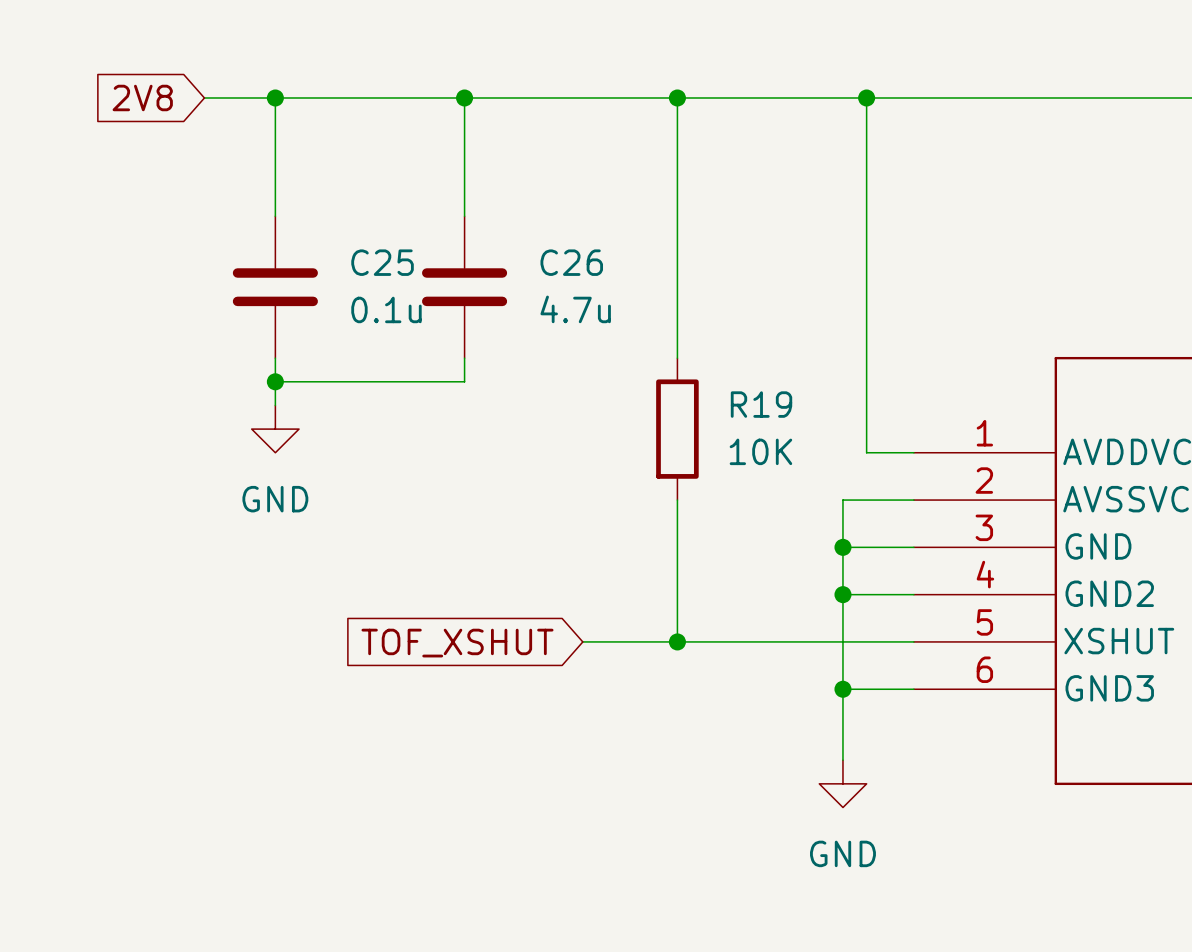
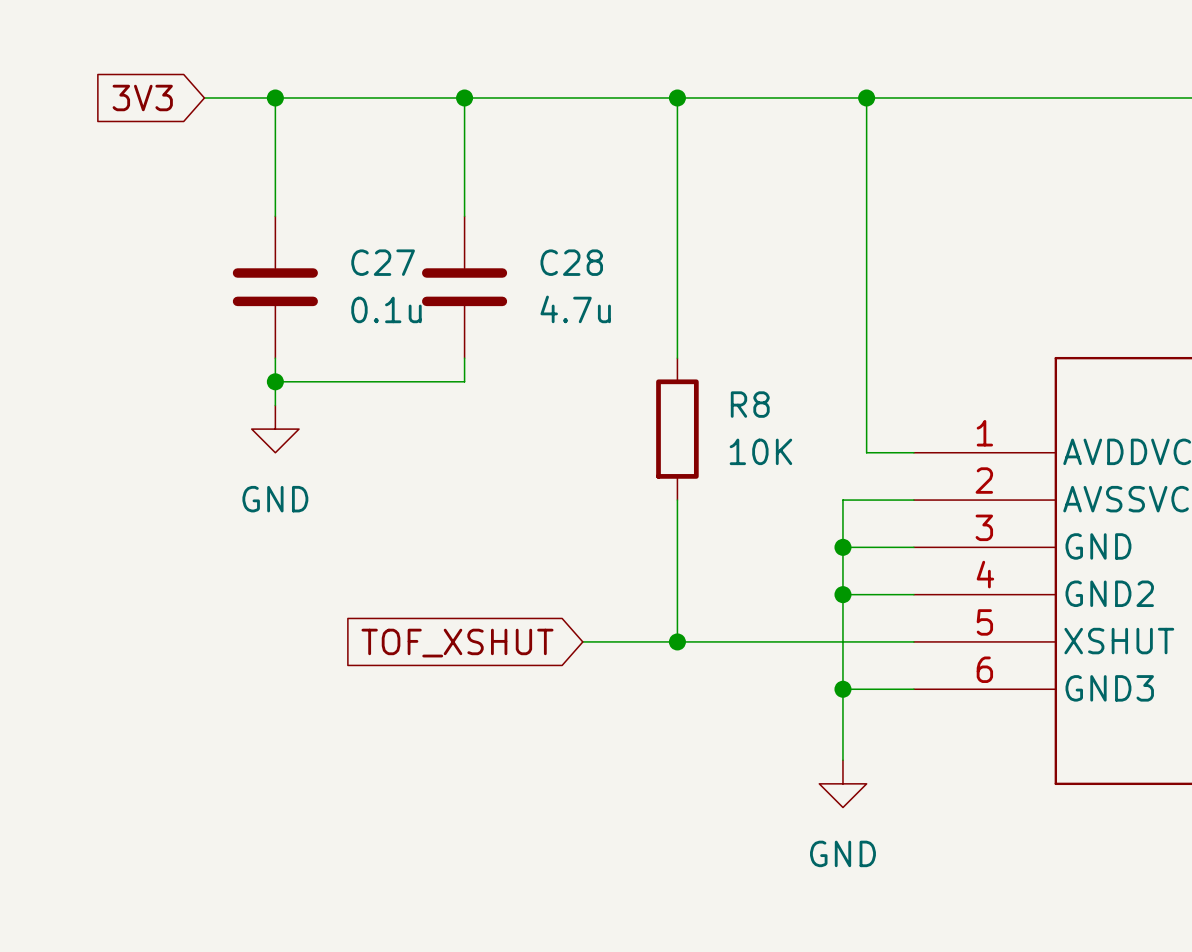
global label: 2V8 (142, 97) -> 3V3 (142, 97)
C25 name: C25 (382, 262) -> C27 (383, 262)
C26 name: C26 (571, 262) -> C28 (571, 262)
R19 name: R19 (761, 404) -> R8 (750, 404)

